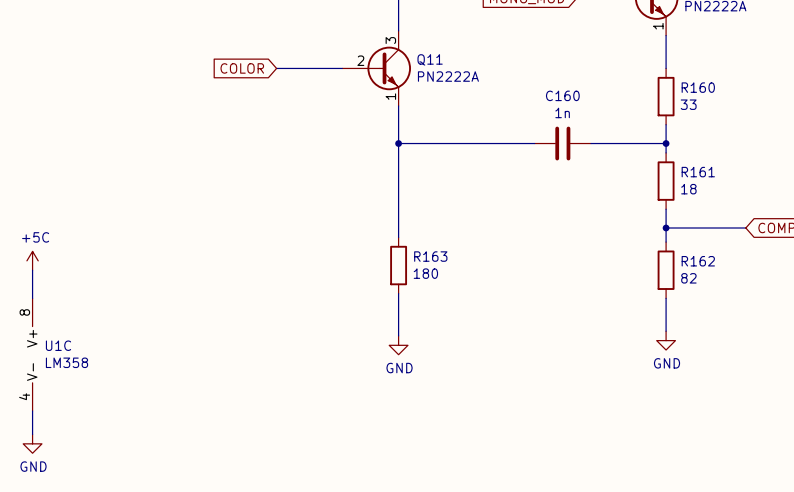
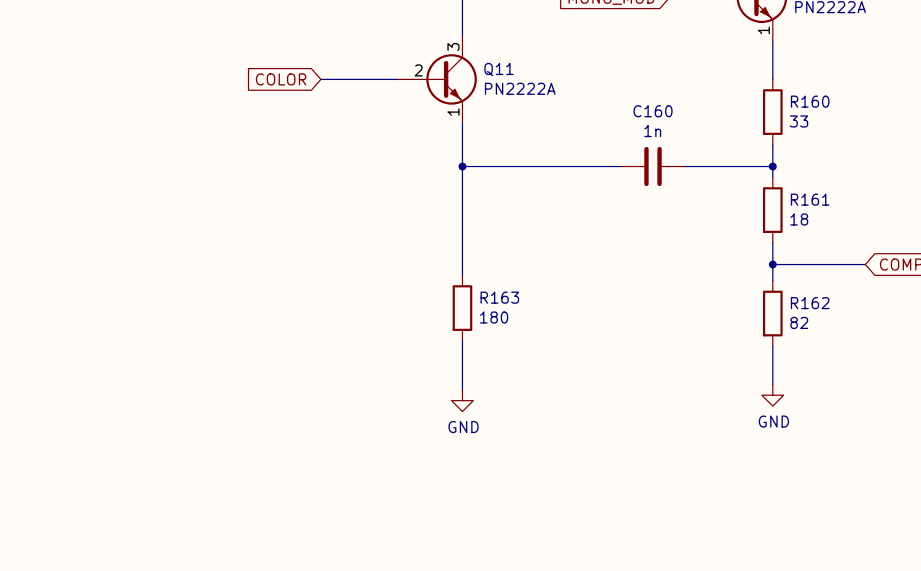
power symbol: +5C (32, 260) -> none
wire: (32, 270) (32, 298) -> none
U1C: LM358 (32, 354) -> none
wire: (32, 411) (32, 434) -> none
power symbol: GND (32, 443) -> none

